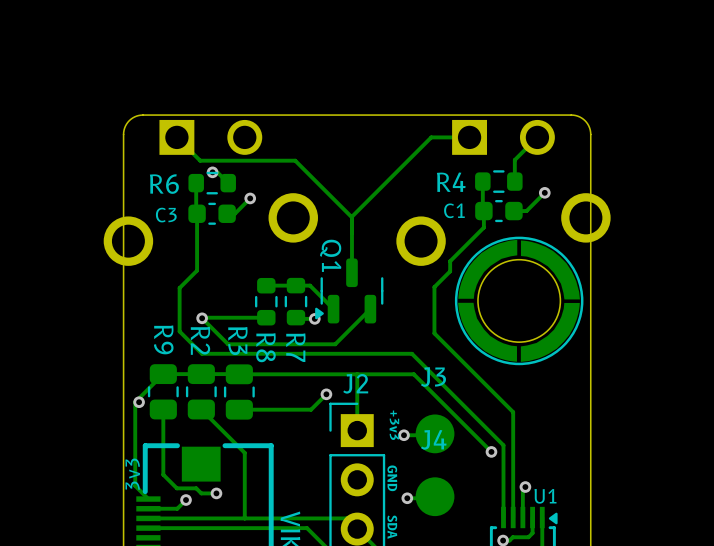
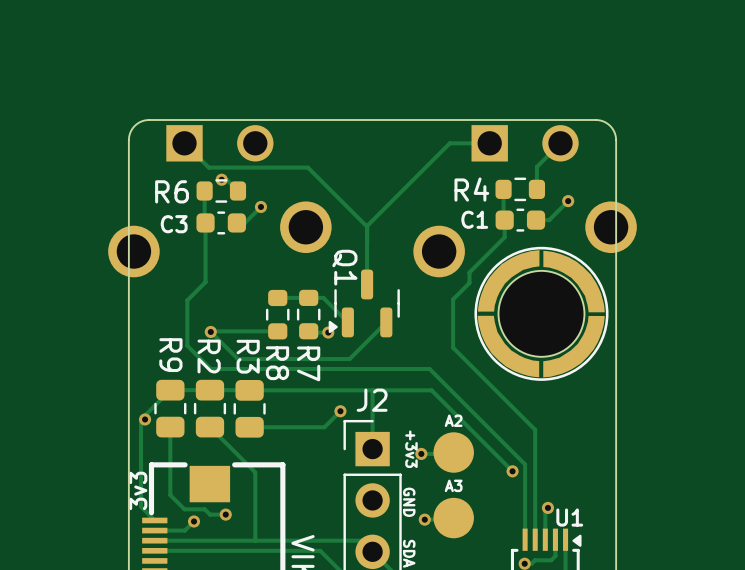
J3 name: J3 (433, 377) -> none
text: none -> A2 (453, 420)
J4 name: J4 (433, 439) -> none
text: none -> A3 (453, 485)

